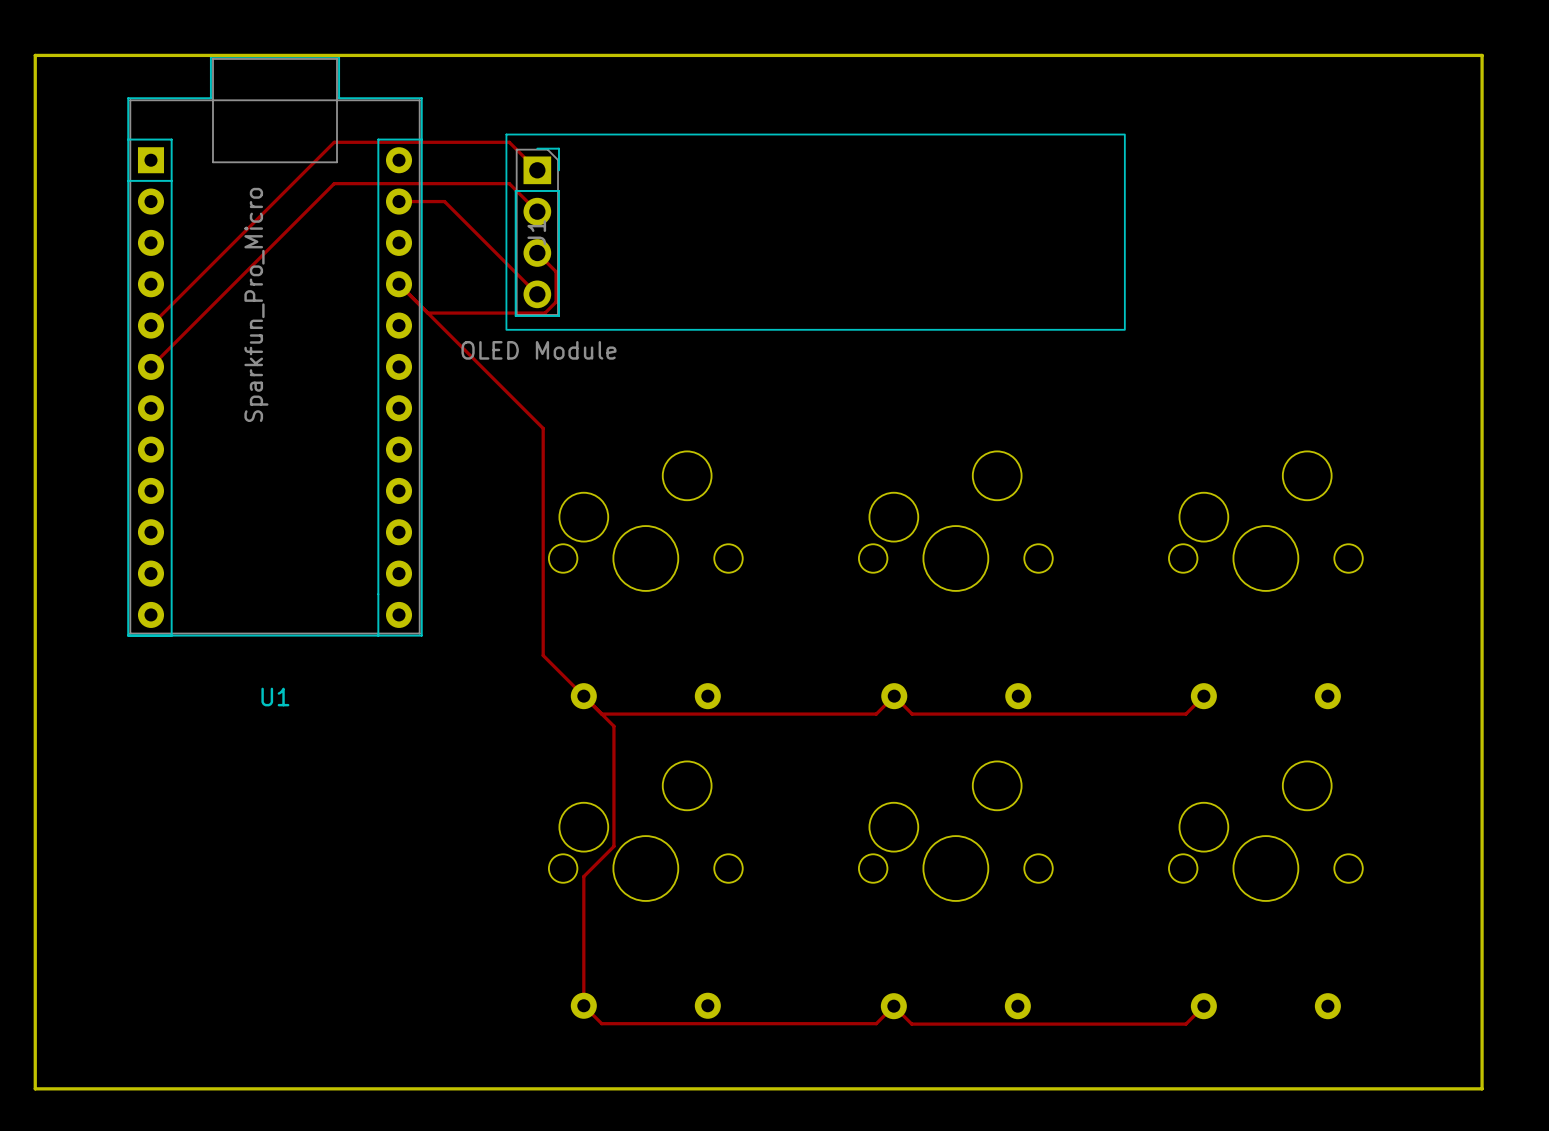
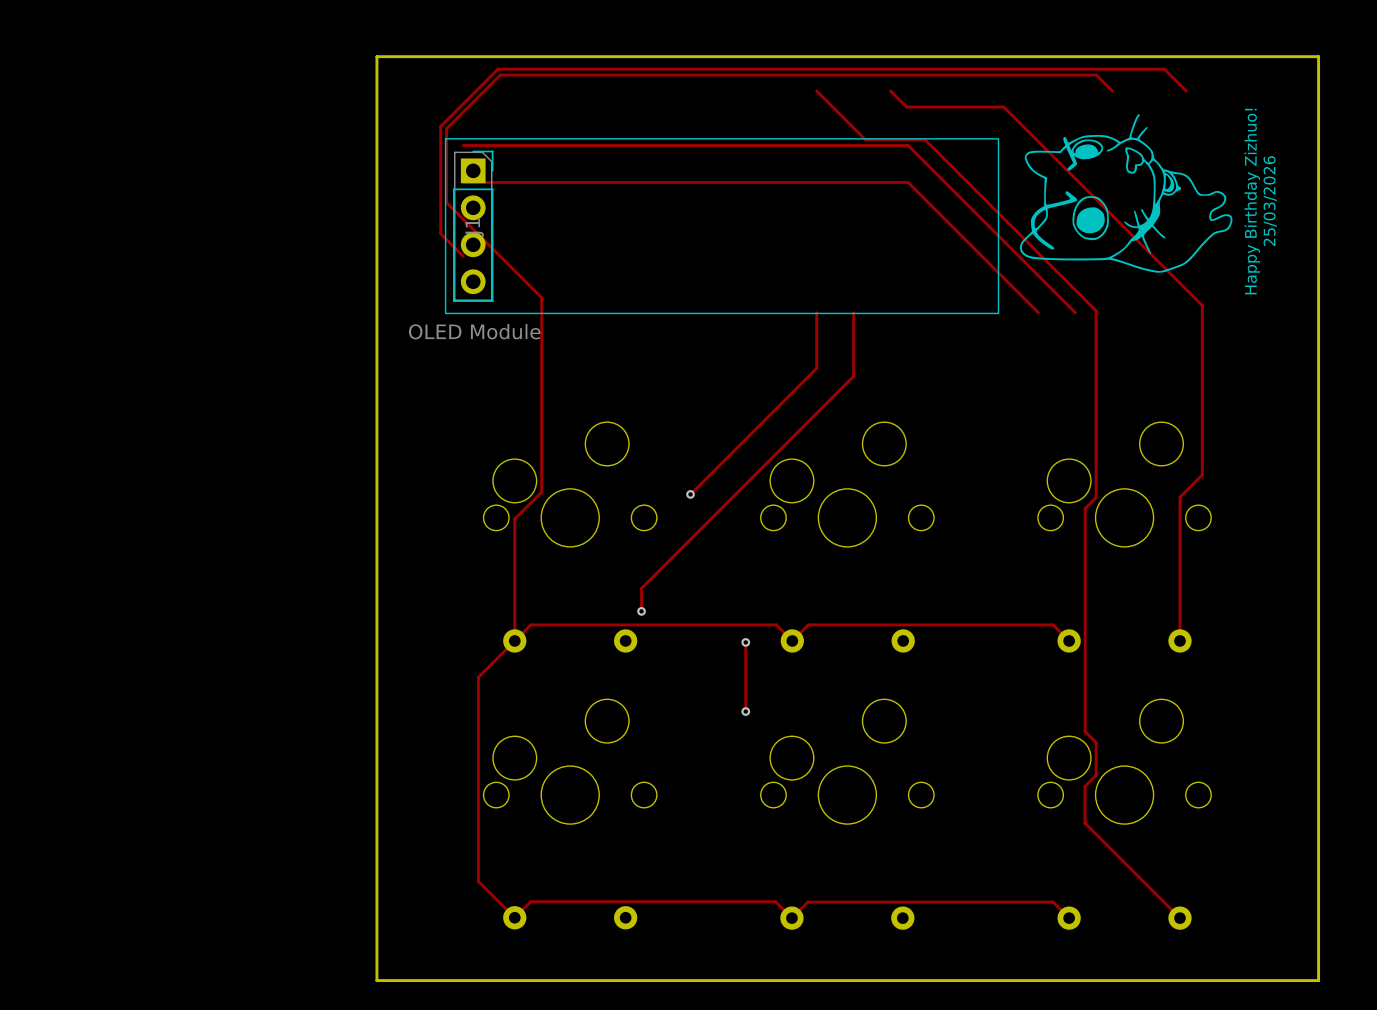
board edge: (35, 55) (1482, 55) (1482, 1088) (35, 1088) (35, 55) -> (376, 56) (376, 980) (1318, 980) (1318, 56) (376, 56)
track: none -> (816, 91) (865, 139) (924, 139) (1096, 310) (1096, 497) (1085, 508) (1085, 731) (1096, 742) (1096, 775) (1085, 786) (1085, 823) (1180, 918)
track: none -> (890, 91) (906, 107) (1003, 107) (1202, 305) (1202, 474) (1180, 497) (1180, 640)
track: none -> (1112, 91) (1096, 75) (500, 75) (446, 128) (446, 202) (541, 297) (541, 492) (514, 519) (514, 640)
track: none -> (1186, 91) (1164, 69) (497, 69) (440, 126) (440, 233) (463, 256)
drawing: none -> [1019, 114, 1233, 273]
track: none -> (463, 145) (908, 145) (1075, 312)
track: (537, 170) (509, 142) (334, 142) (150, 325) -> none
track: none -> (463, 182) (908, 182) (1038, 312)
track: (399, 201) (444, 201) (537, 294) -> none
text: none -> Happy Birthday Zizhuo! (1252, 201)
text: none -> 25/03/2026 (1270, 201)
track: (537, 211) (509, 183) (334, 183) (150, 366) -> none
track: (537, 252) (556, 271) (556, 302) (545, 313) (427, 313) -> none
track: (399, 284) (543, 428) (543, 655) (613, 726) (613, 846) (583, 876) (583, 1005) (601, 1023) (876, 1023) (893, 1006) (911, 1024) (1185, 1024) (1203, 1006) -> none
track: none -> (816, 312) (816, 368) (690, 494)
track: none -> (853, 312) (853, 376) (641, 588) (641, 611)
U1: Sparkfun_Pro_Micro (275, 346) -> none
via: none -> (690, 494)
via: none -> (641, 611)
track: (1203, 696) (1185, 714) (912, 714) (894, 696) (876, 714) (601, 714) -> (1069, 640) (1053, 624) (808, 624) (792, 640) (776, 624) (530, 624) (478, 677) (478, 881) (514, 917) (530, 901) (775, 901) (791, 918) (807, 902) (1053, 902) (1069, 918)
track: none -> (745, 642) (745, 711)
via: none -> (745, 642)
via: none -> (745, 711)

